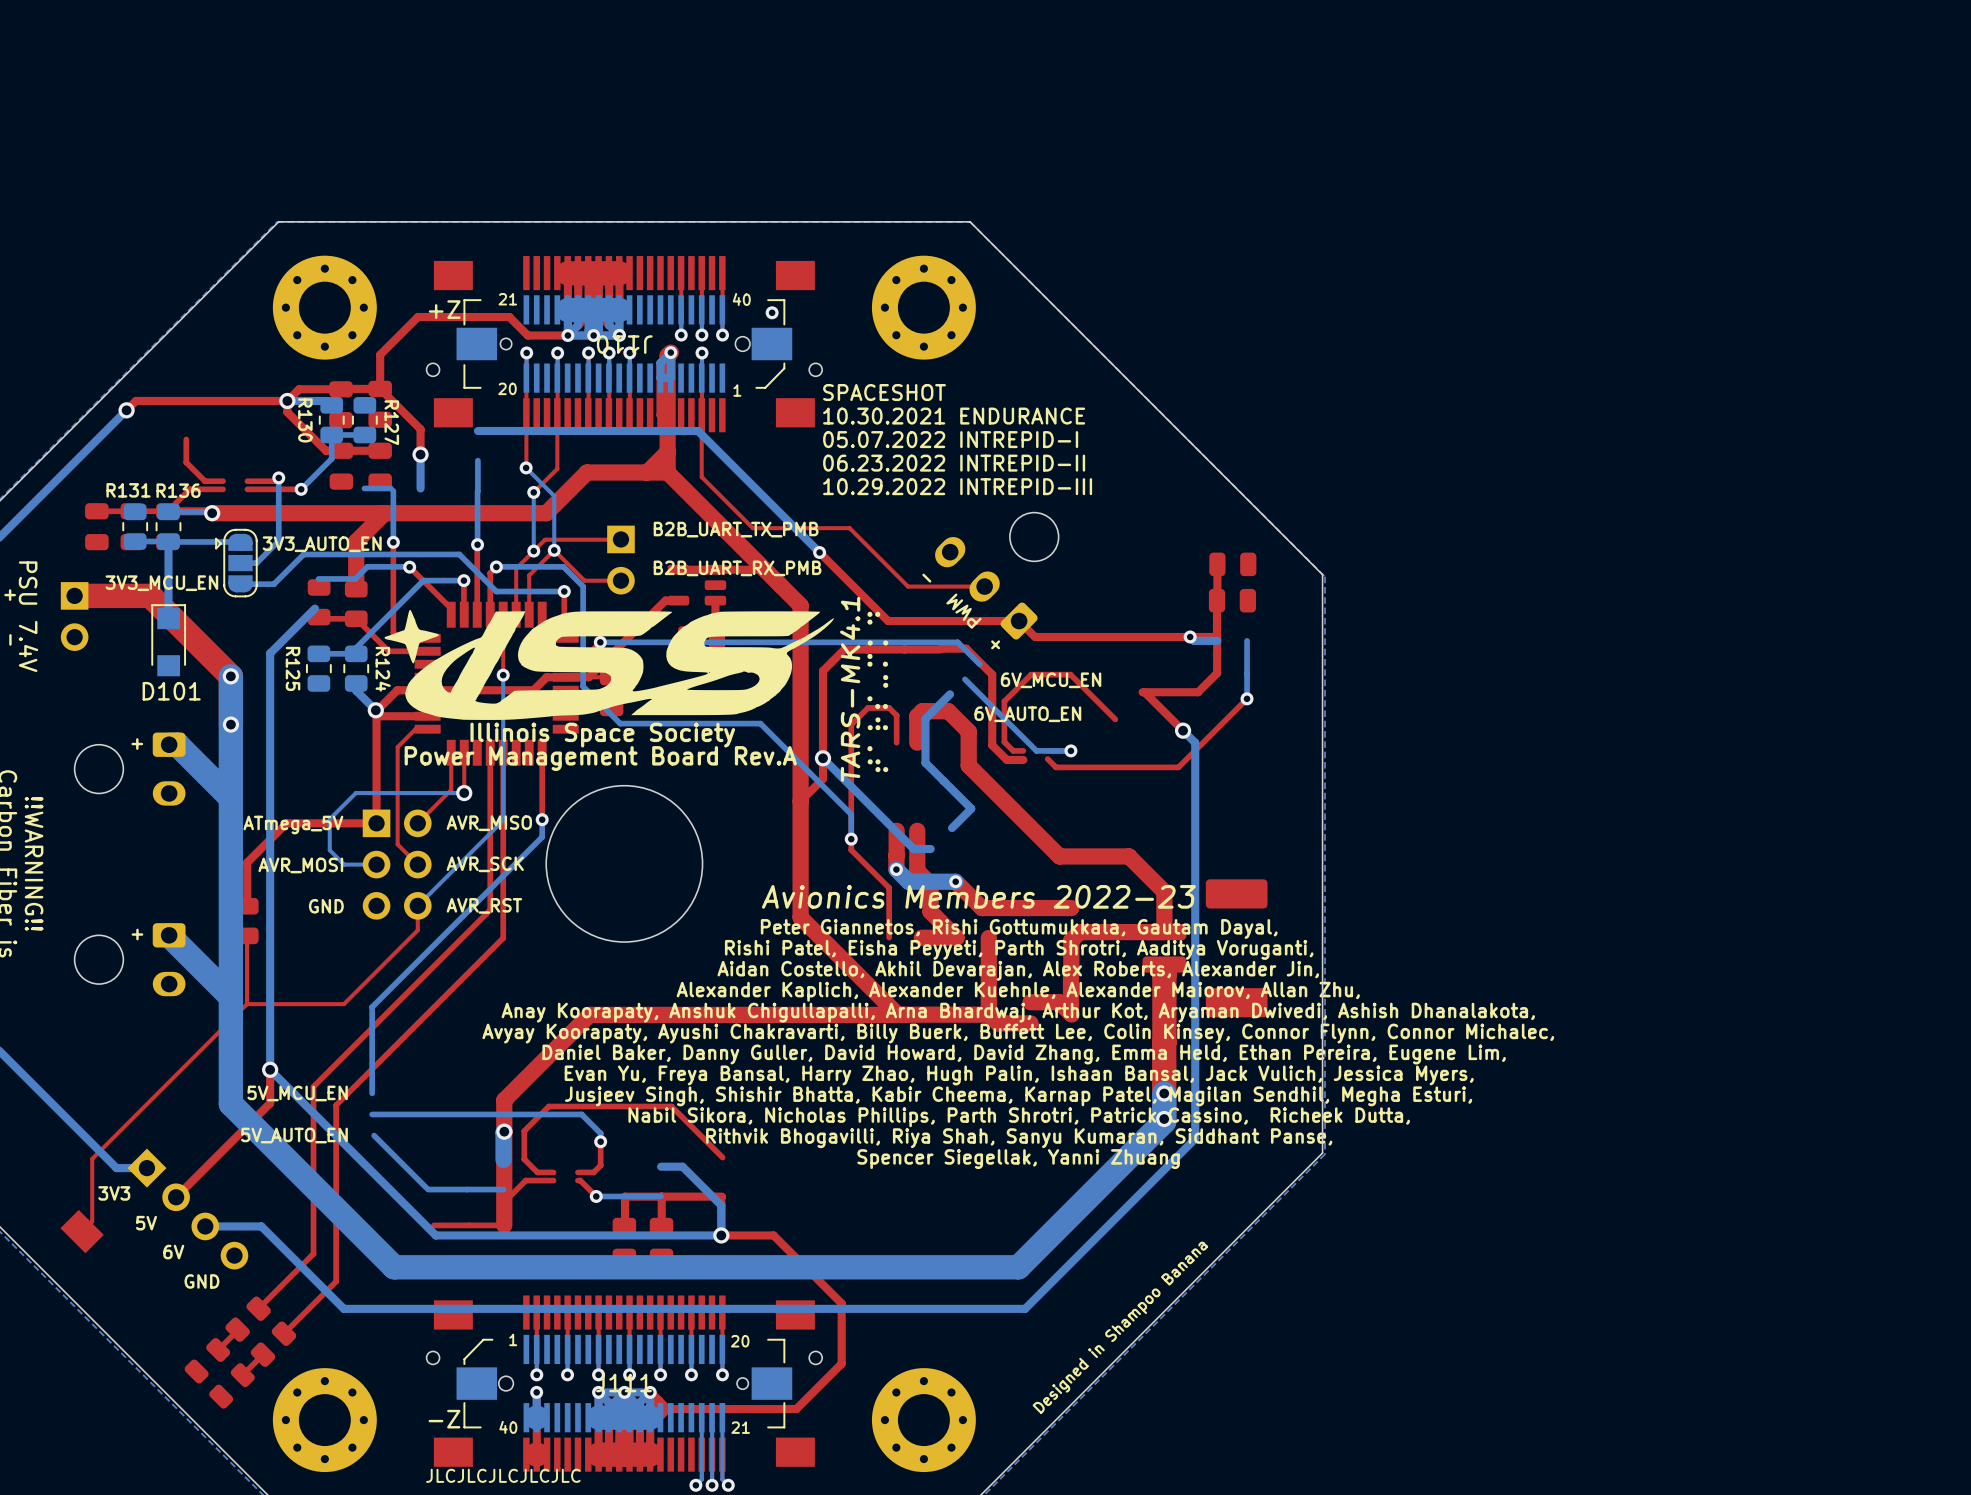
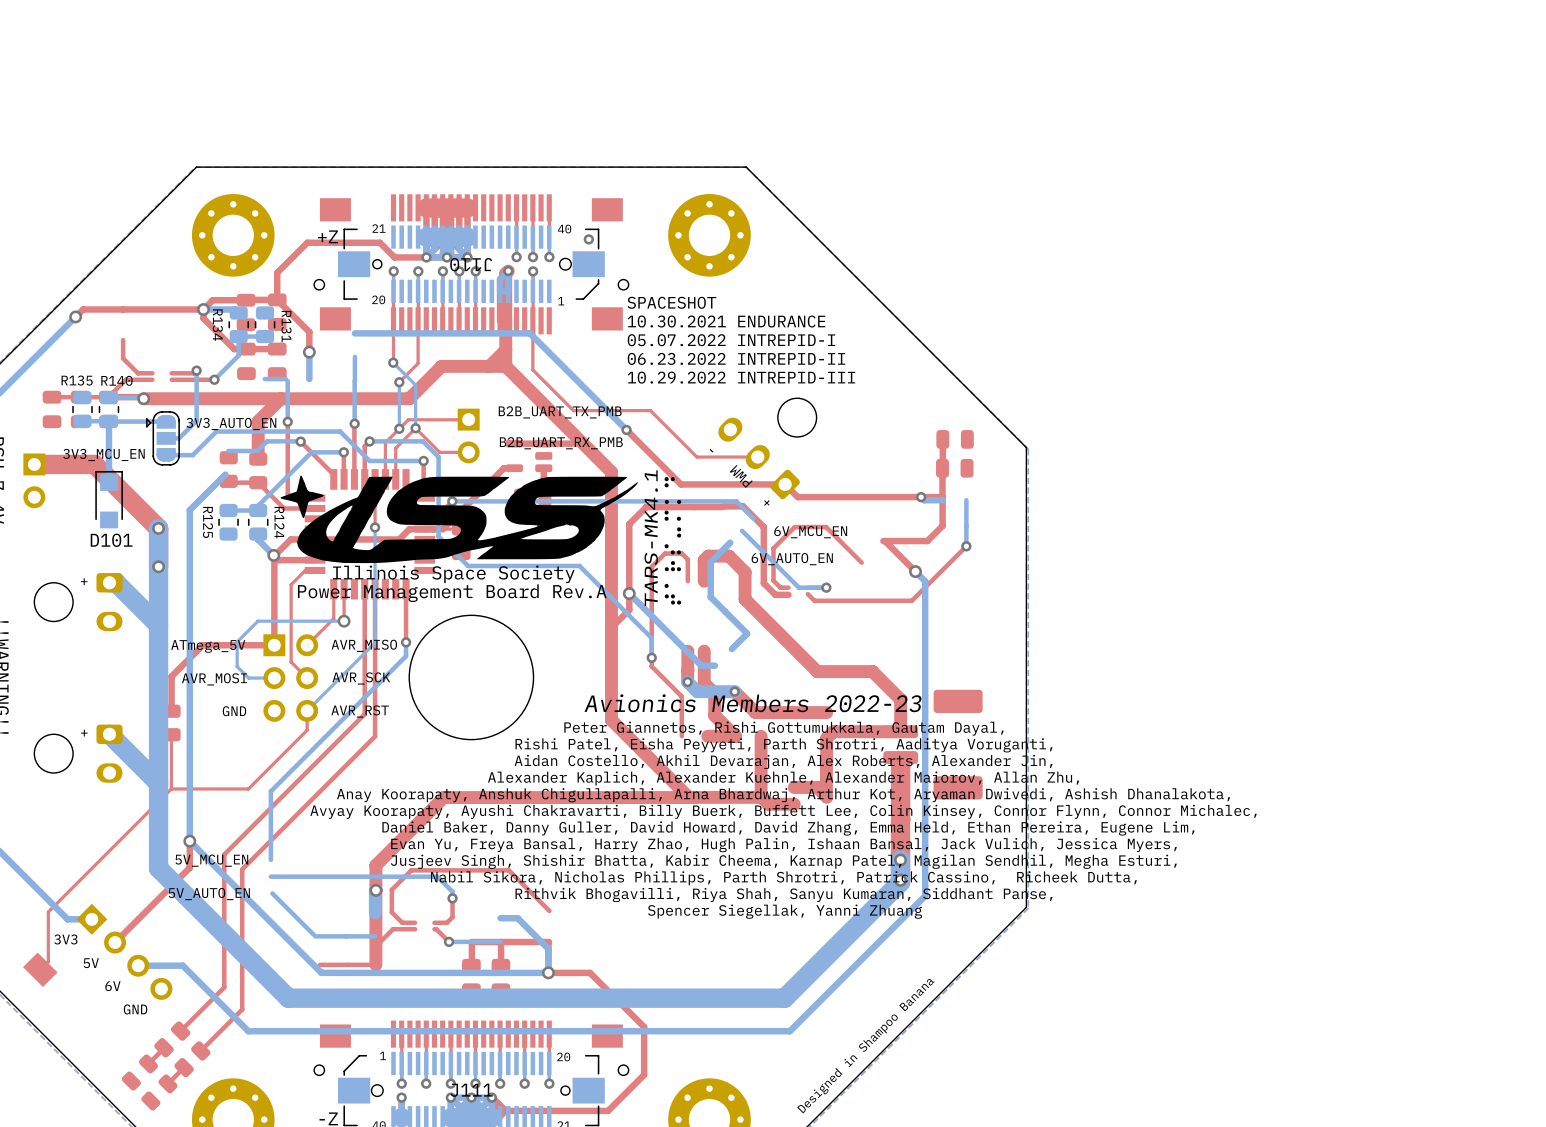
R130 name: R130 (305, 420) -> R134 (217, 325)
R127 name: R127 (391, 422) -> R131 (286, 326)
R131 name: R131 (128, 490) -> R135 (77, 380)
R136 name: R136 (178, 490) -> R140 (116, 380)

